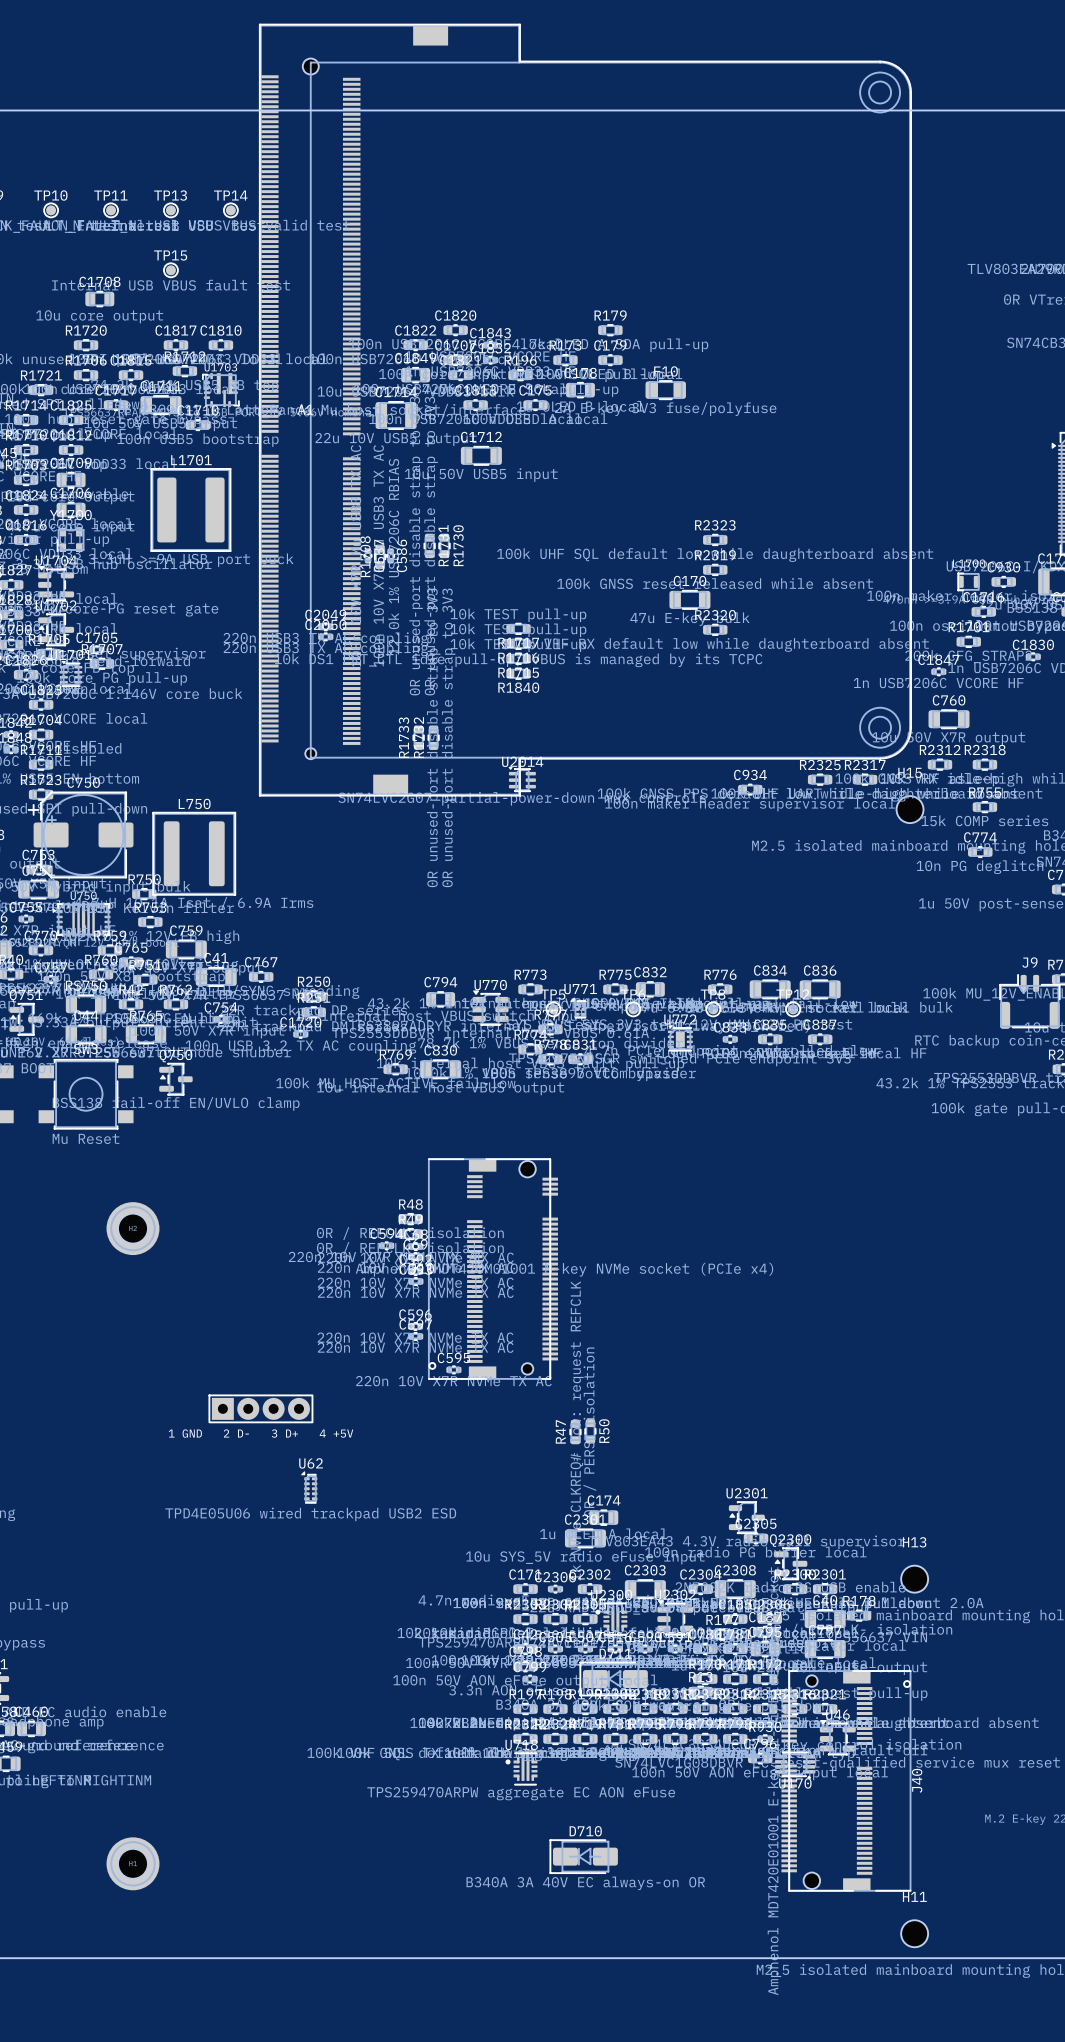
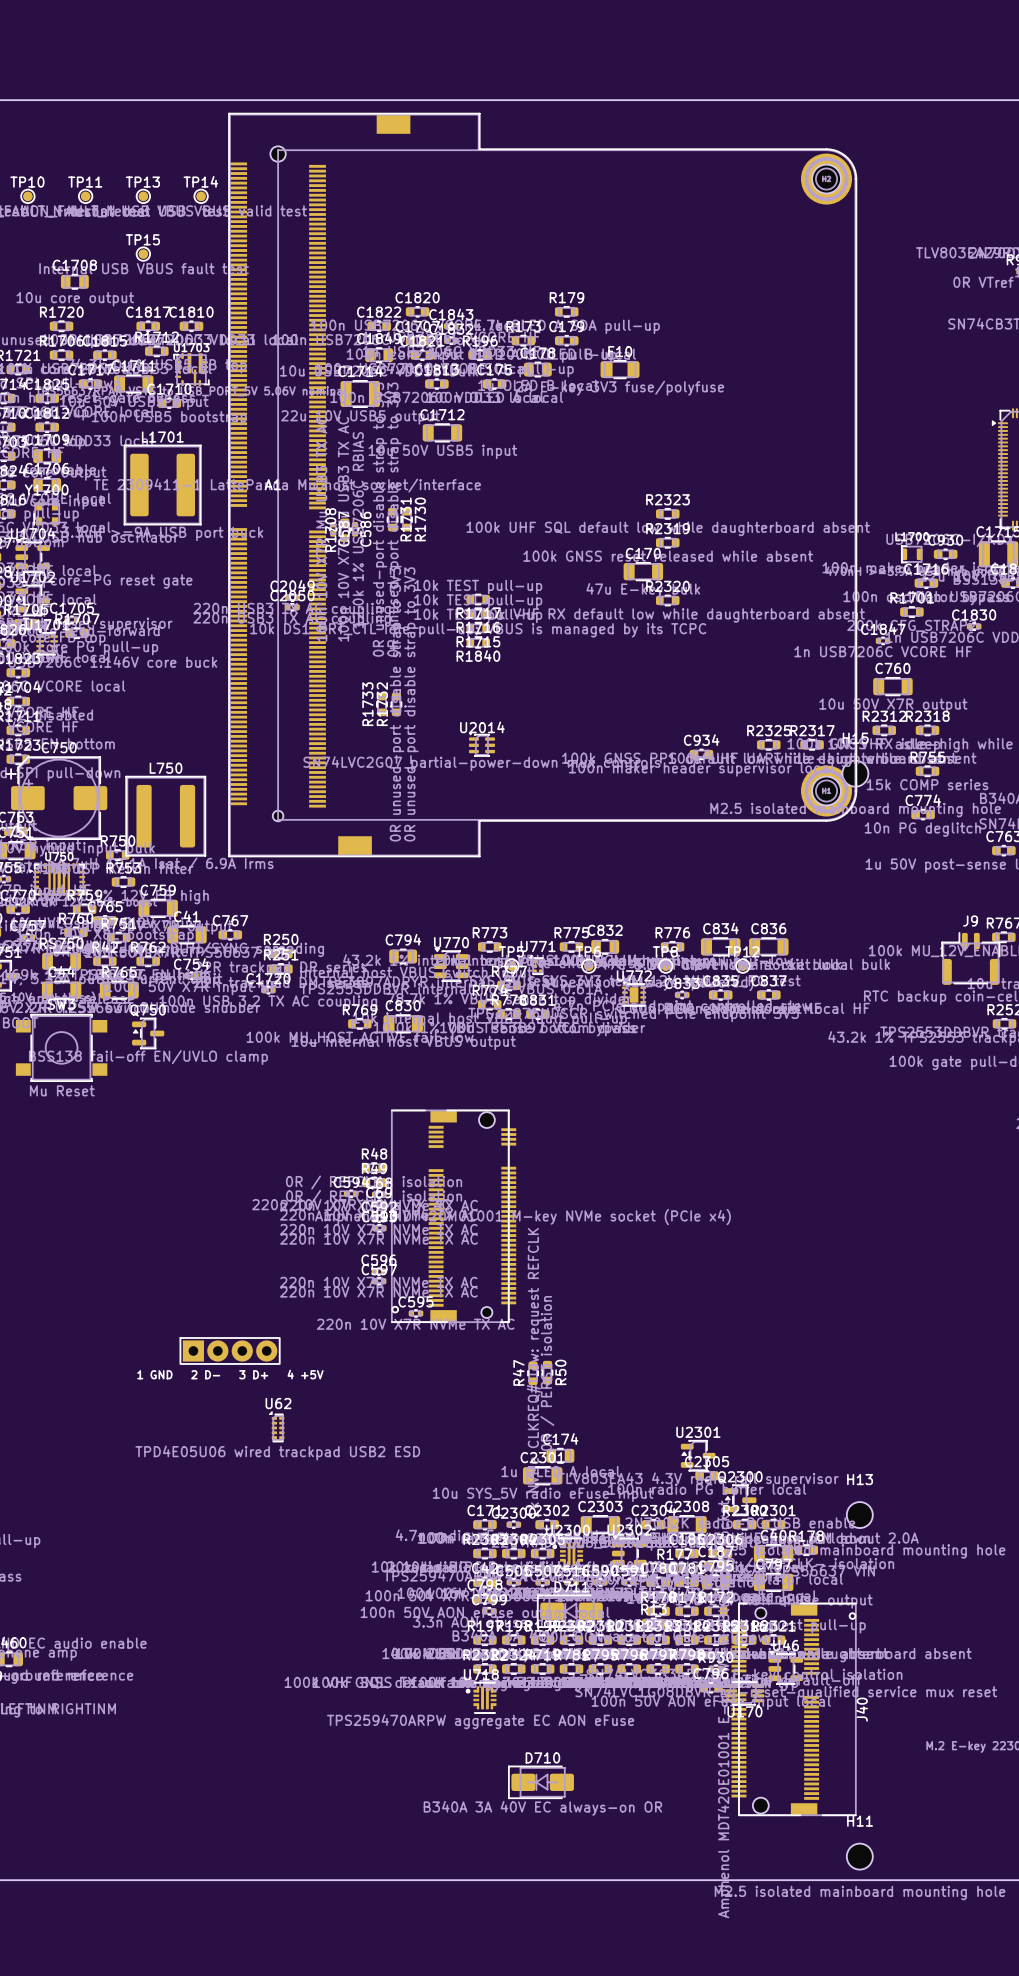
A1 position: (585, 410) -> (542, 485)
part position: (132, 1228) -> (826, 179)
part position: (132, 1863) -> (826, 791)

